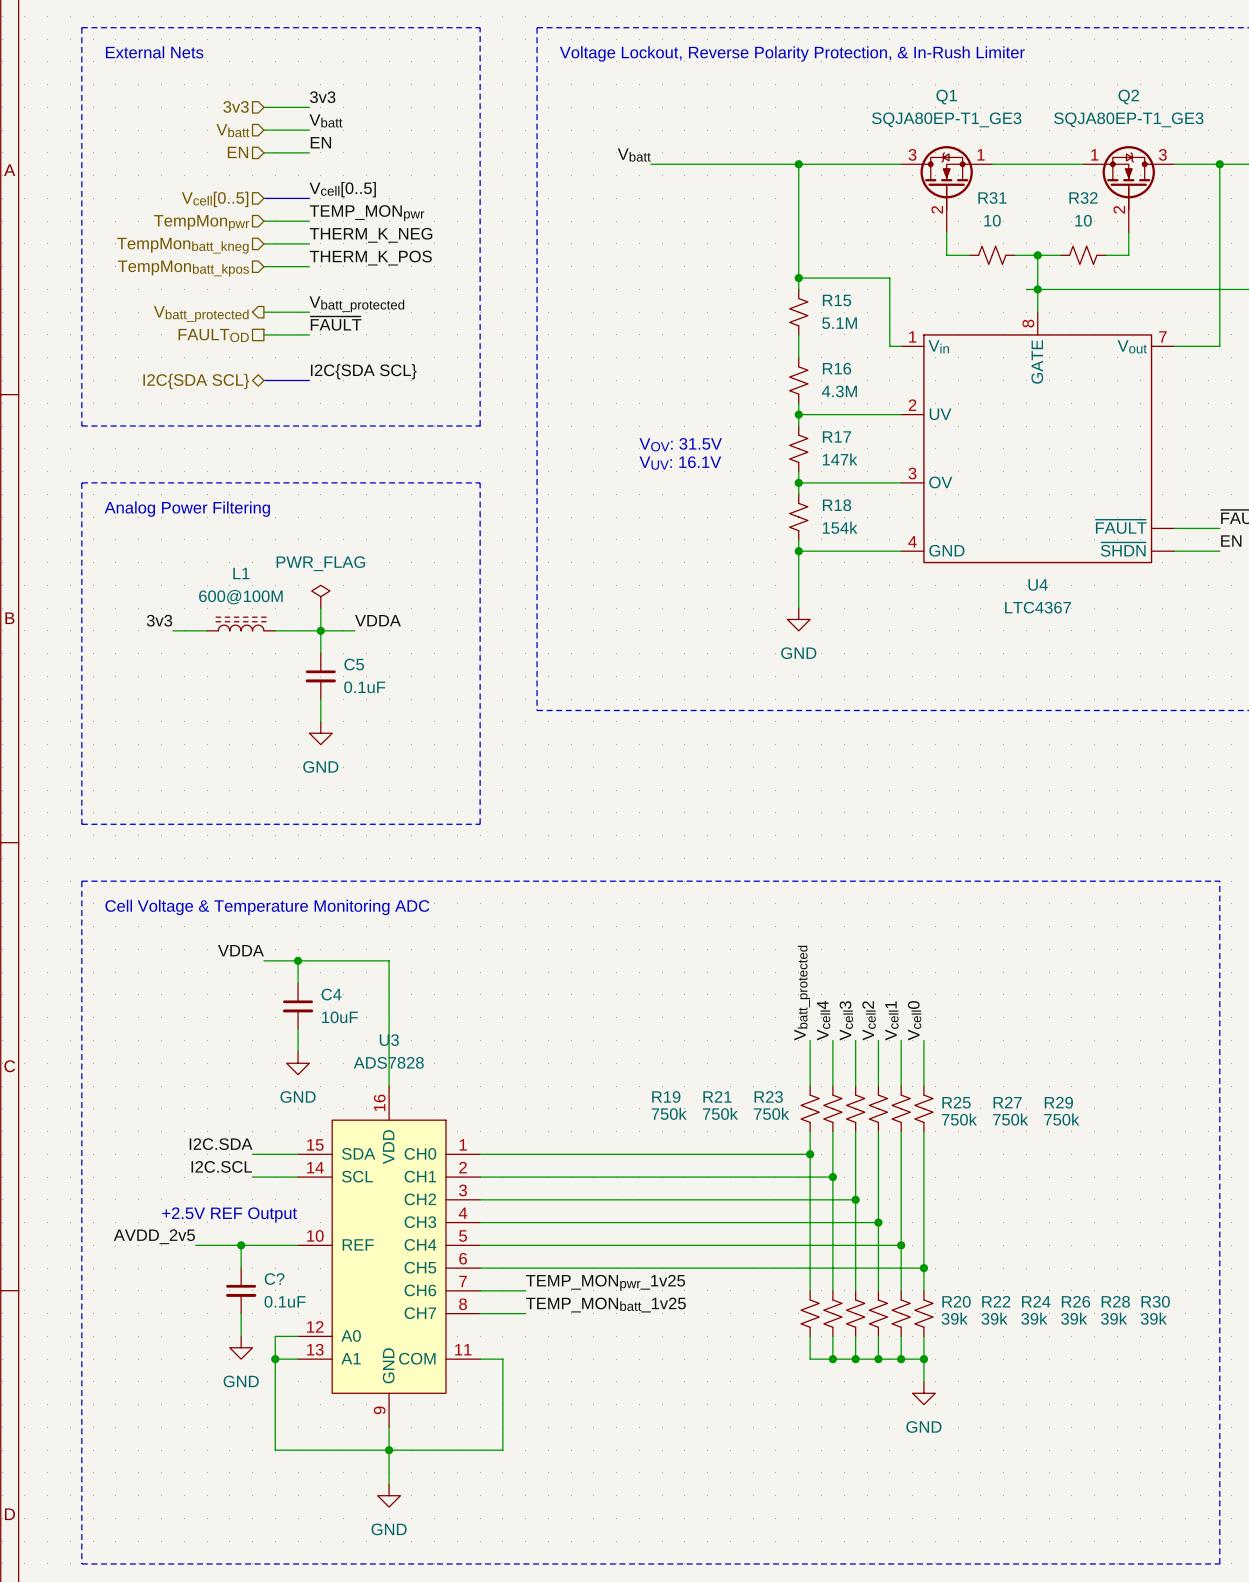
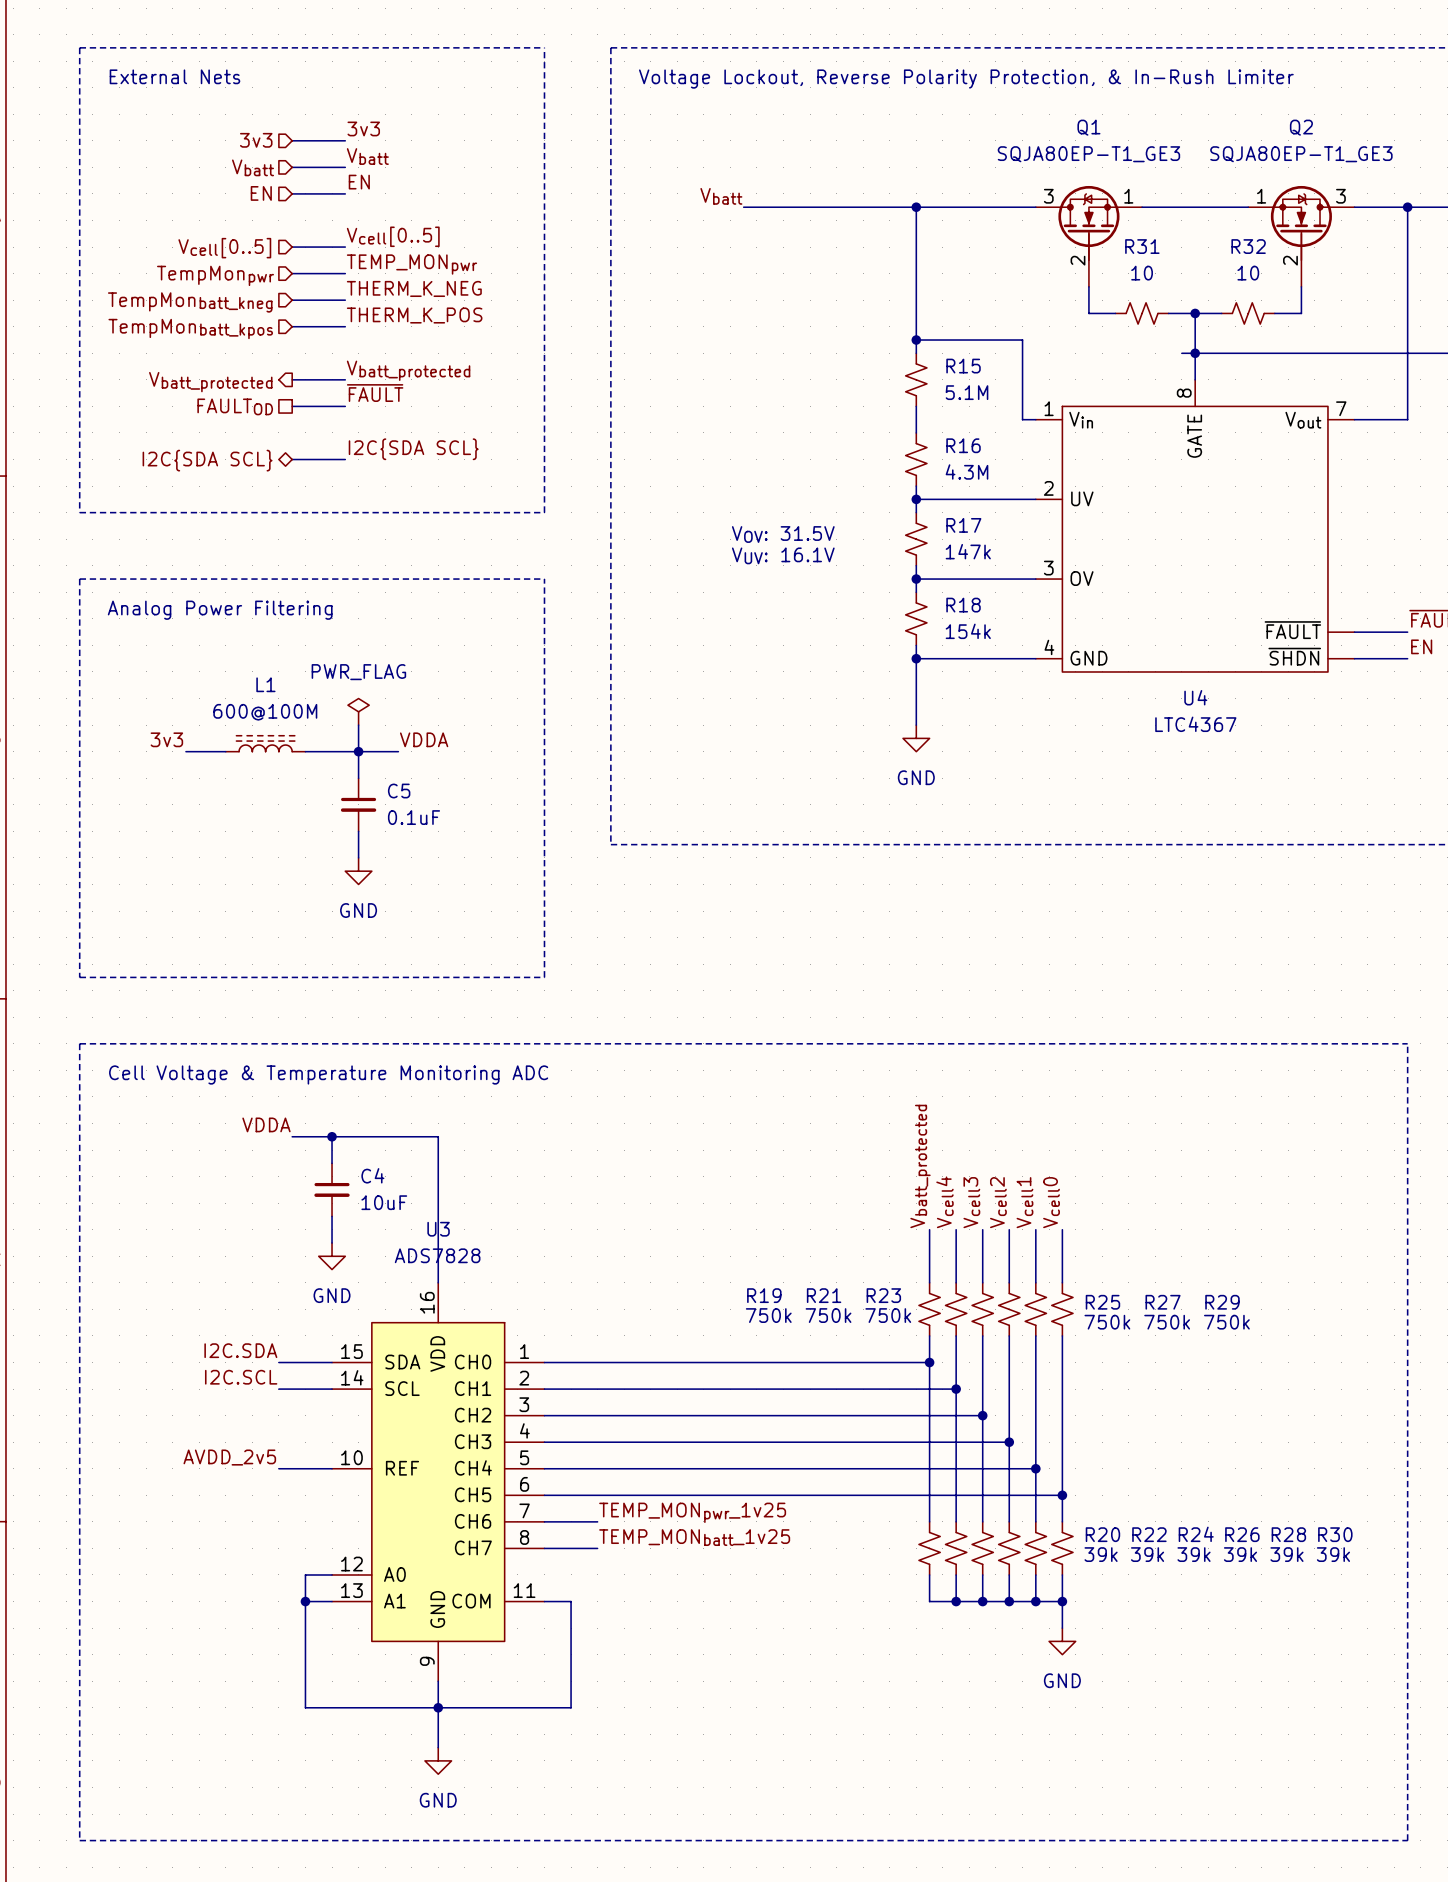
text: +2.5V REF Output (229, 1214) -> none
label position: AVDD_2v5 (154, 1236) -> AVDD_2v5 (229, 1457)
wire: (195, 1245) (252, 1245) -> none
wire: (241, 1245) (241, 1268) -> none
junction: (241, 1245) -> none
C?: 0.1uF (241, 1290) -> none
wire: (241, 1313) (241, 1336) -> none
power symbol: GND (241, 1347) -> none

